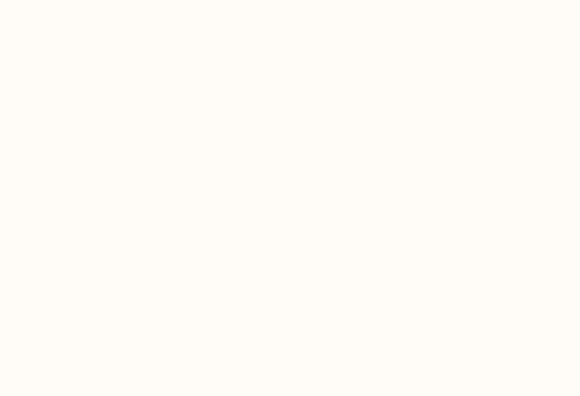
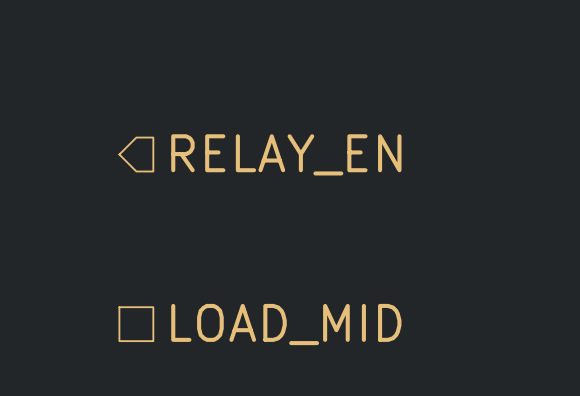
hierarchical label: none -> RELAY_EN (286, 154)
hierarchical label: none -> LOAD_MID (286, 324)

